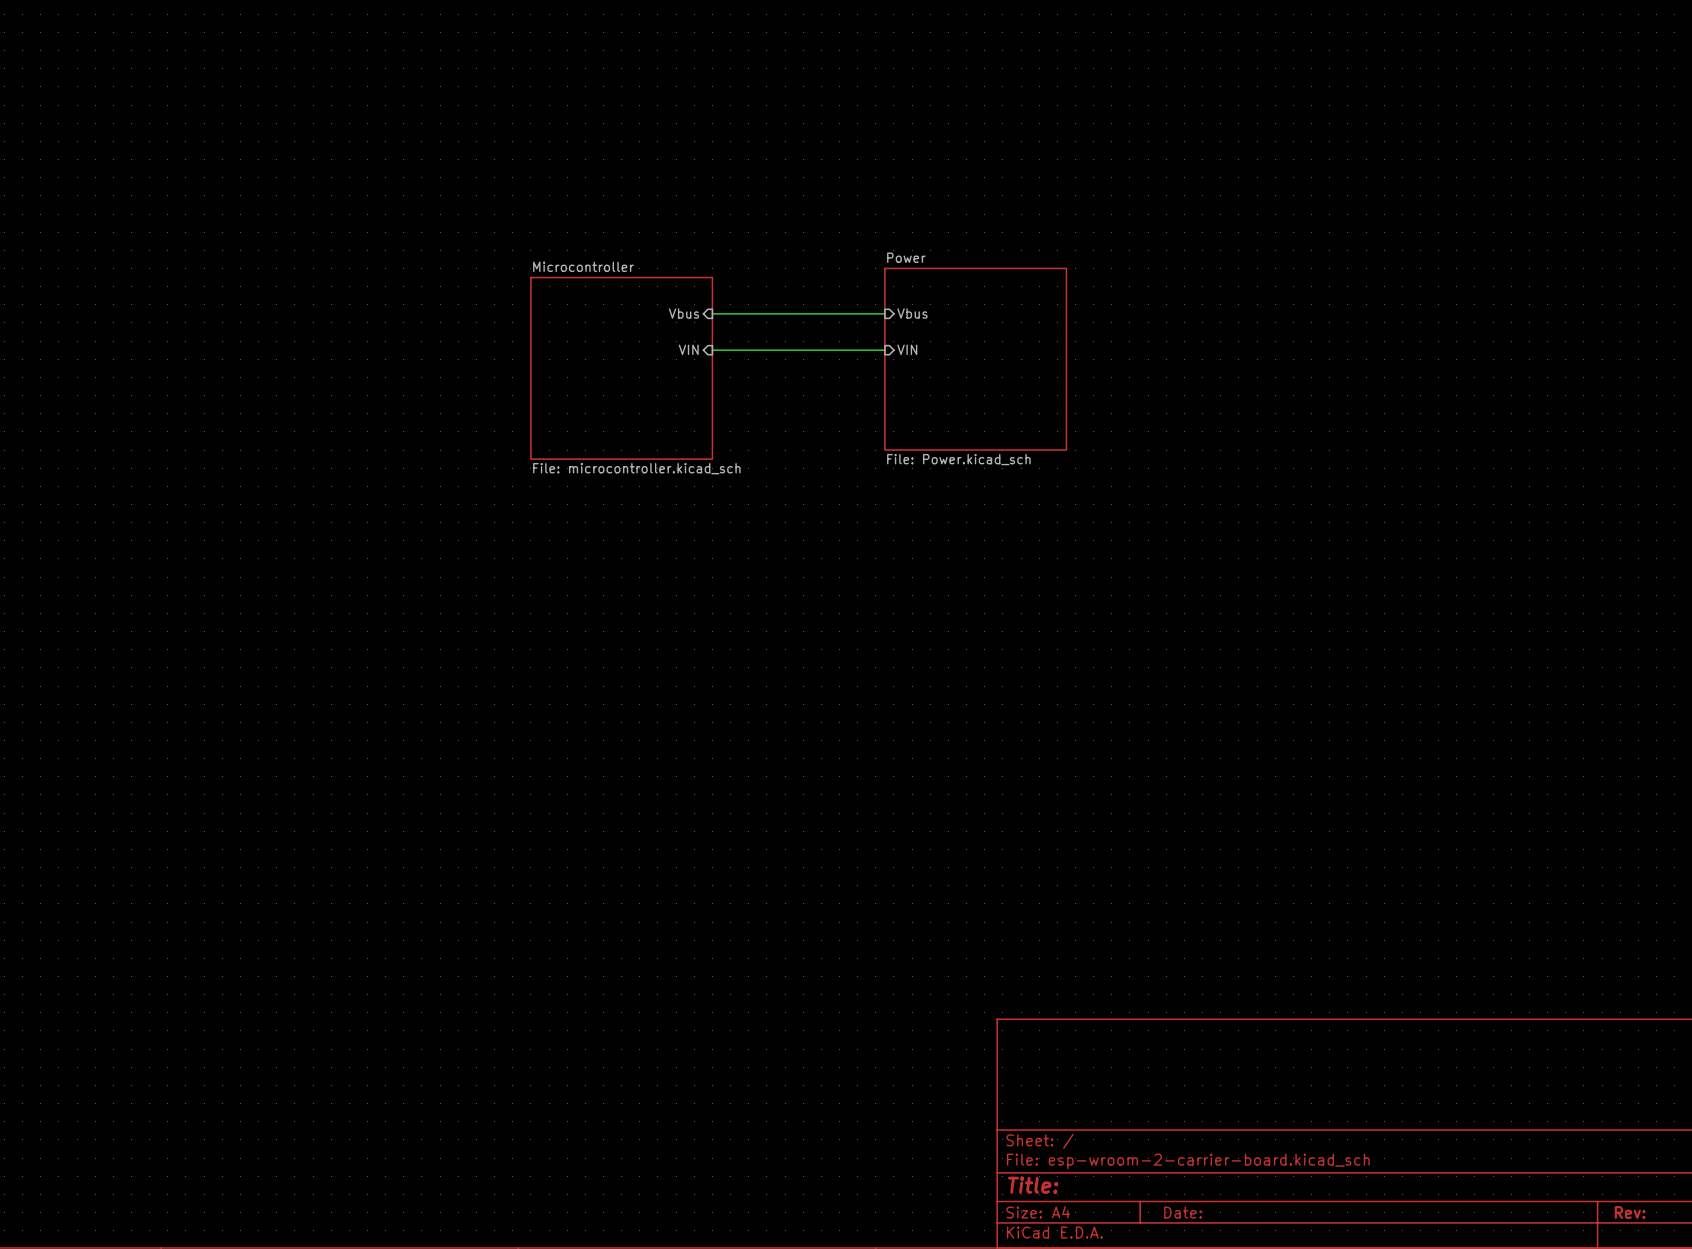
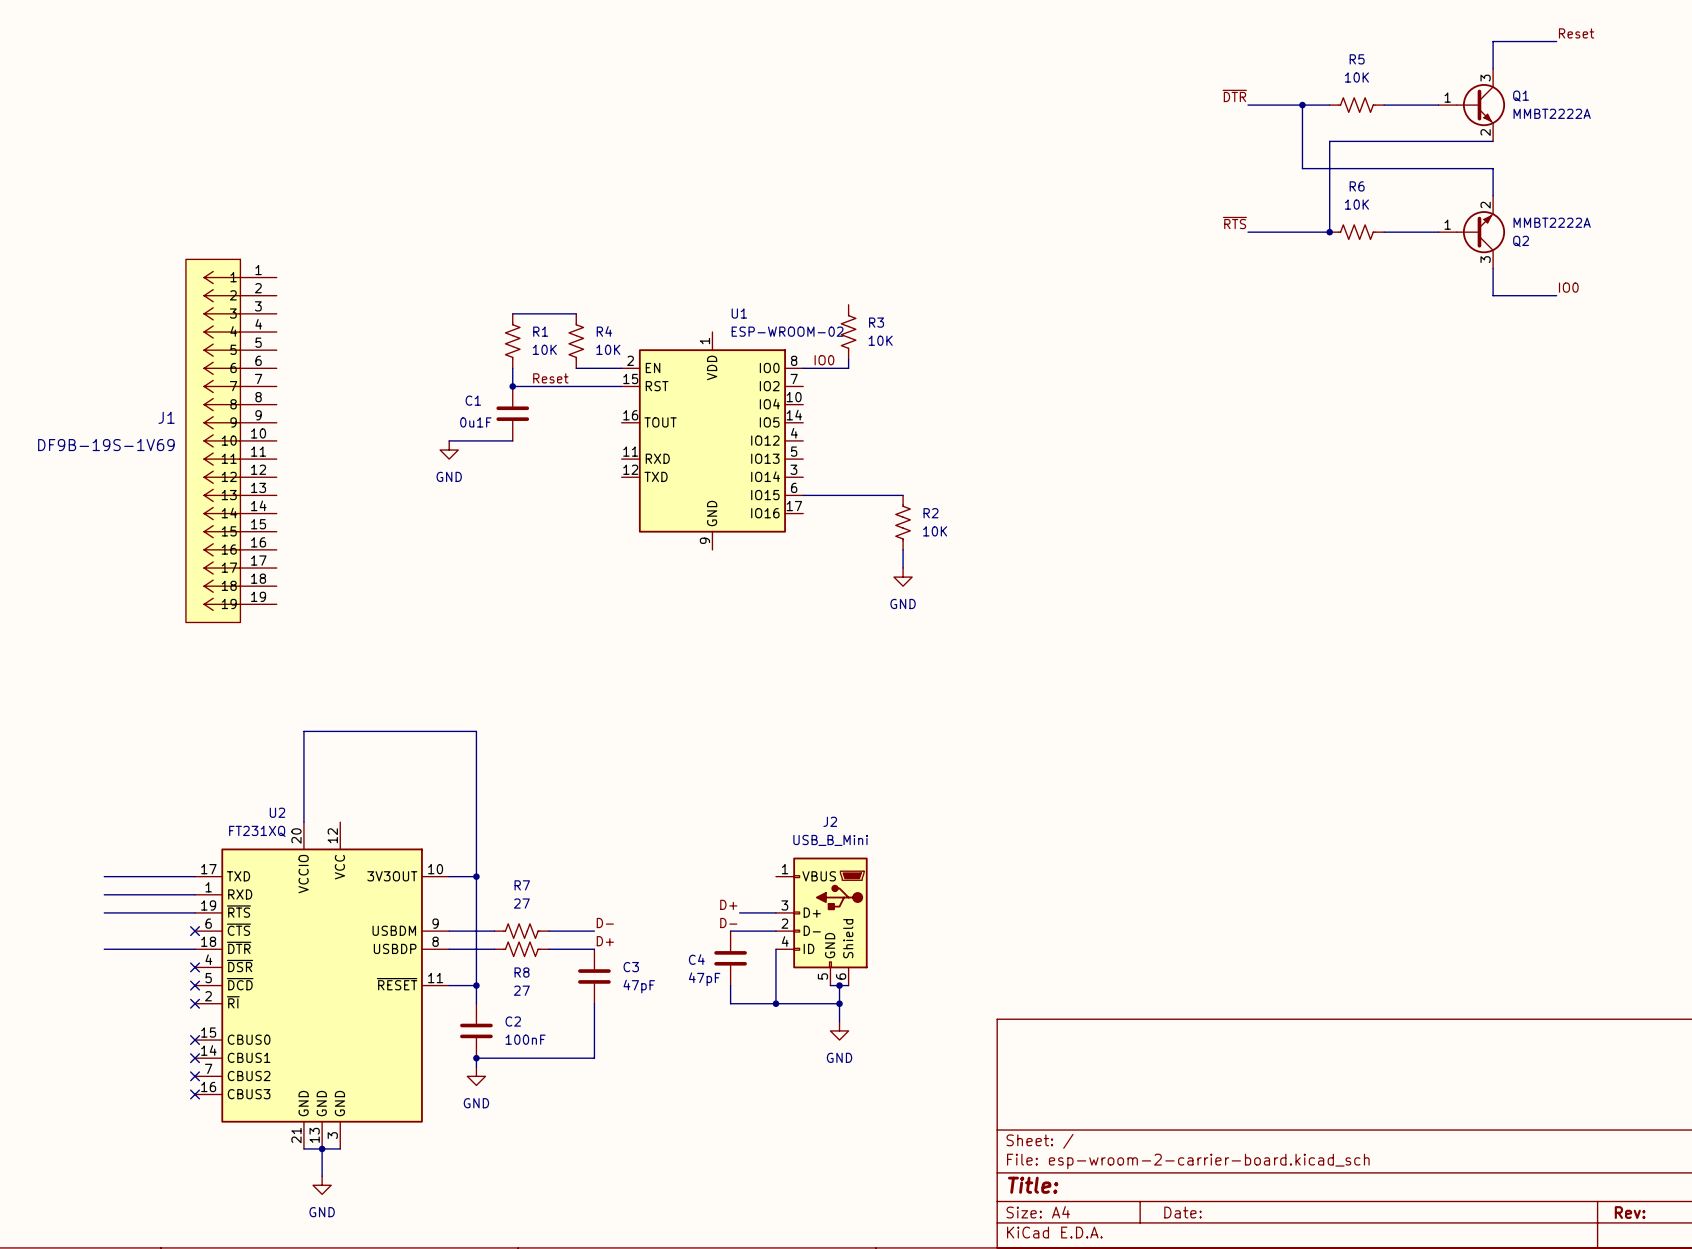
label: none -> Reset (1576, 33)
wire: none -> (1556, 41) (1493, 41) (1493, 68)
label: none -> ~{DTR} (1234, 95)
wire: none -> (1247, 105) (1329, 105)
wire: none -> (1302, 105) (1302, 168) (1493, 168) (1493, 195)
junction: none -> (1302, 105)
R5: none -> 10K (1356, 105)
wire: none -> (1384, 105) (1438, 105)
Q1: none -> MMBT2222A (1471, 105)
wire: none -> (1493, 141) (1329, 141) (1329, 232) (1247, 232)
label: none -> ~{RTS} (1234, 223)
junction: none -> (1329, 232)
R6: none -> 10K (1356, 232)
wire: none -> (1384, 232) (1438, 232)
Q2: none -> MMBT2222A (1471, 232)
wire: none -> (1493, 268) (1493, 295) (1556, 295)
label: none -> IO0 (1568, 287)
wire: none -> (512, 313) (576, 313)
sheet pin: Vbus (683, 313) -> none
wire: (712, 313) (884, 313) -> none
sheet pin: Vbus (912, 313) -> none
R3: none -> 10K (848, 332)
R1: none -> 10K (512, 341)
R4: none -> 10K (576, 341)
sheet pin: VIN (688, 349) -> none
sheet pin: VIN (907, 349) -> none
wire: (712, 350) (884, 350) -> none
wire: none -> (848, 359) (848, 368) (803, 368)
sheet Power: File: Power.kicad_sch (975, 359) -> none
label: none -> IO0 (824, 360)
wire: none -> (512, 368) (512, 386) (621, 386)
wire: none -> (576, 368) (621, 368)
sheet Microcontroller: File: microcontroller.kicad_sch (621, 368) -> none
label: none -> Reset (550, 378)
junction: none -> (512, 386)
C1: none -> 0u1F (512, 413)
J1: none -> DF9B-19S-1V69 (231, 440)
wire: none -> (449, 440) (512, 440)
U1: none -> ESP-WROOM-02 (712, 440)
power symbol: none -> GND (449, 450)
wire: none -> (803, 495) (903, 495)
R2: none -> 10K (903, 522)
wire: none -> (903, 549) (903, 568)
power symbol: none -> GND (903, 577)
wire: none -> (303, 822) (303, 731) (476, 731) (476, 1003)
wire: none -> (104, 876) (195, 876)
wire: none -> (449, 876) (476, 876)
junction: none -> (476, 876)
wire: none -> (104, 894) (195, 894)
label: none -> D+ (728, 904)
wire: none -> (104, 912) (195, 912)
wire: none -> (739, 912) (775, 912)
J2: none -> USB_B_Mini (821, 921)
label: none -> D- (605, 923)
label: none -> D- (728, 923)
no-connect mark: none -> (195, 931)
wire: none -> (449, 931) (494, 931)
R7: none -> 27 (521, 931)
wire: none -> (549, 931) (594, 931)
wire: none -> (730, 931) (775, 931)
label: none -> D+ (605, 941)
wire: none -> (104, 949) (195, 949)
wire: none -> (449, 949) (494, 949)
R8: none -> 27 (521, 949)
wire: none -> (549, 949) (594, 949)
wire: none -> (775, 949) (775, 1003)
C4: none -> 47pF (730, 958)
no-connect mark: none -> (195, 967)
C3: none -> 47pF (594, 976)
no-connect mark: none -> (195, 985)
U2: none -> FT231XQ (322, 985)
wire: none -> (449, 985) (476, 985)
junction: none -> (476, 985)
wire: none -> (730, 985) (730, 1003) (839, 1003)
wire: none -> (830, 985) (848, 985)
wire: none -> (839, 985) (839, 1021)
junction: none -> (839, 985)
no-connect mark: none -> (195, 1003)
wire: none -> (594, 1003) (594, 1058) (476, 1058) (476, 1067)
junction: none -> (775, 1003)
junction: none -> (839, 1003)
C2: none -> 100nF (476, 1030)
power symbol: none -> GND (839, 1030)
no-connect mark: none -> (195, 1040)
no-connect mark: none -> (195, 1058)
junction: none -> (476, 1058)
no-connect mark: none -> (195, 1076)
power symbol: none -> GND (476, 1076)
no-connect mark: none -> (195, 1094)
wire: none -> (303, 1148) (340, 1148)
wire: none -> (322, 1148) (322, 1176)
junction: none -> (322, 1148)
power symbol: none -> GND (322, 1185)

